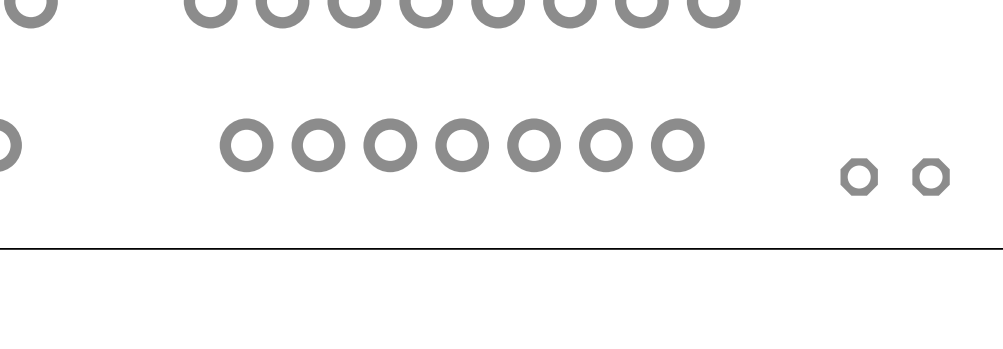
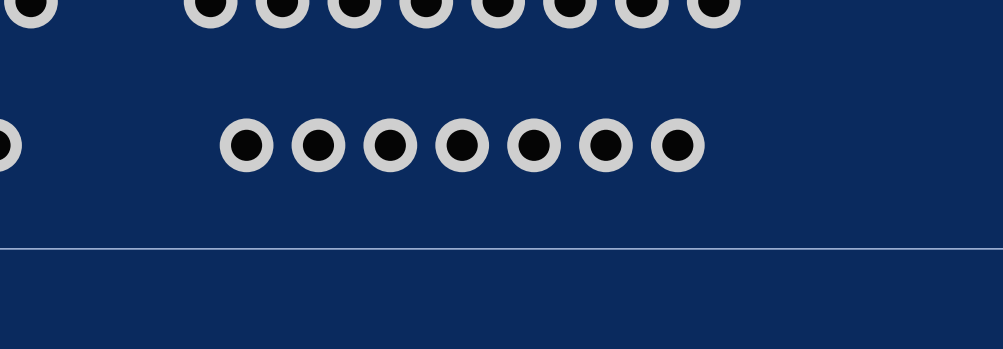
part: (895, 177) -> none

